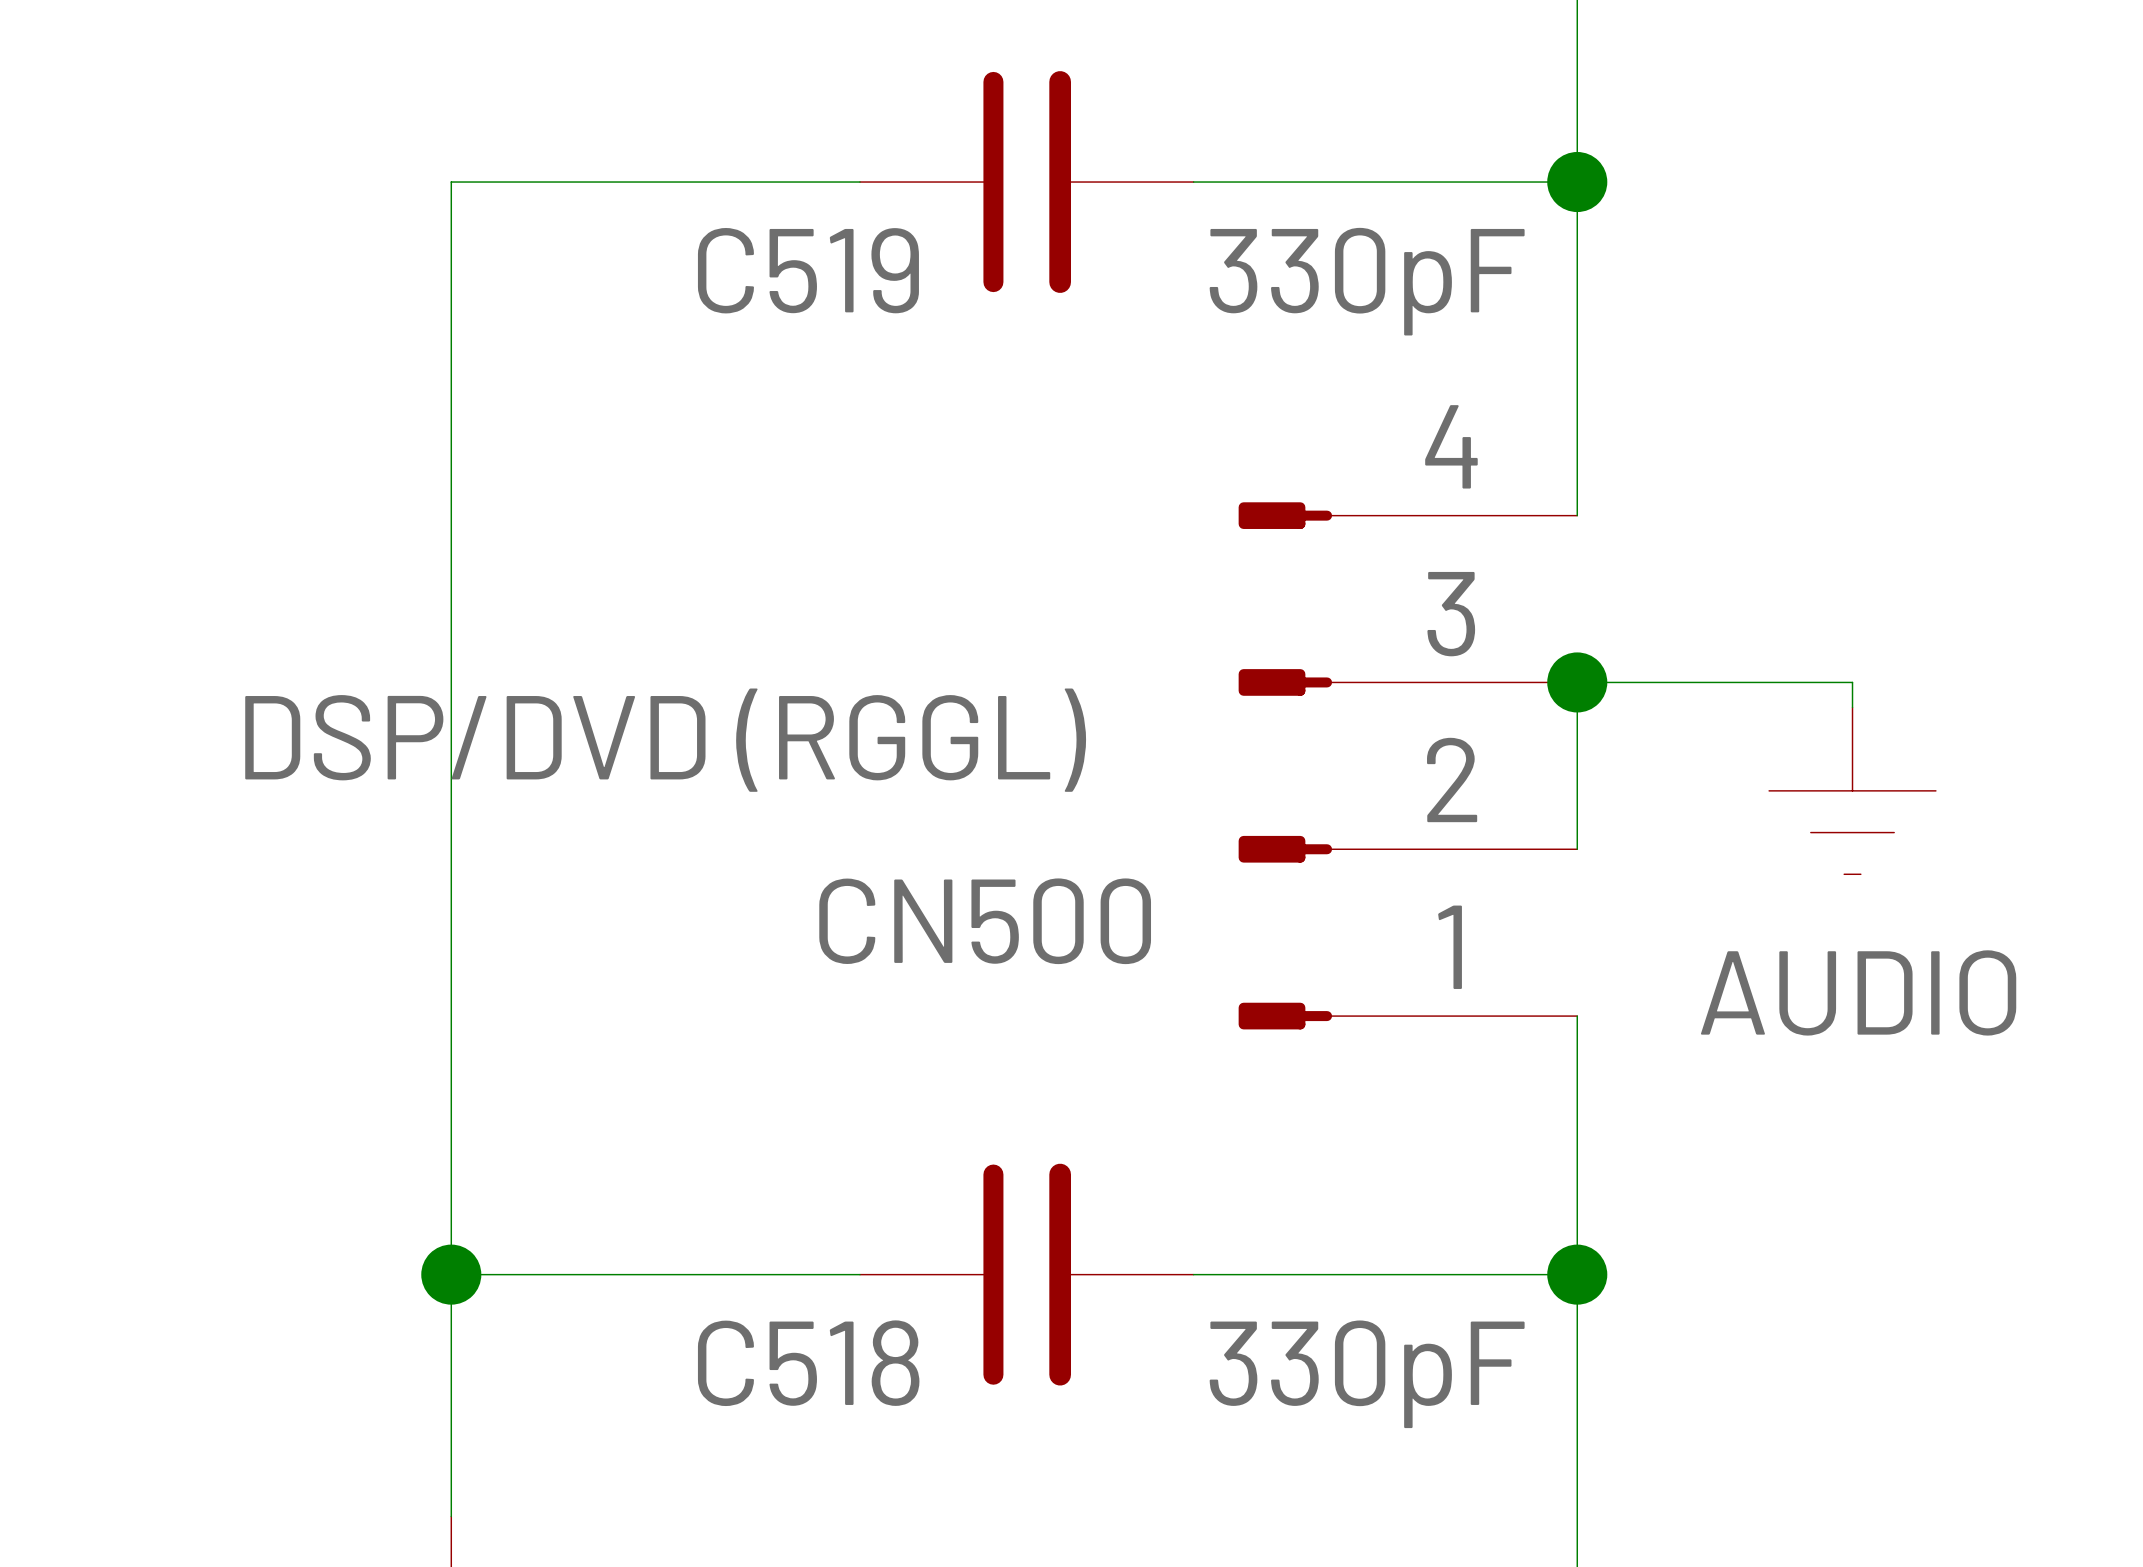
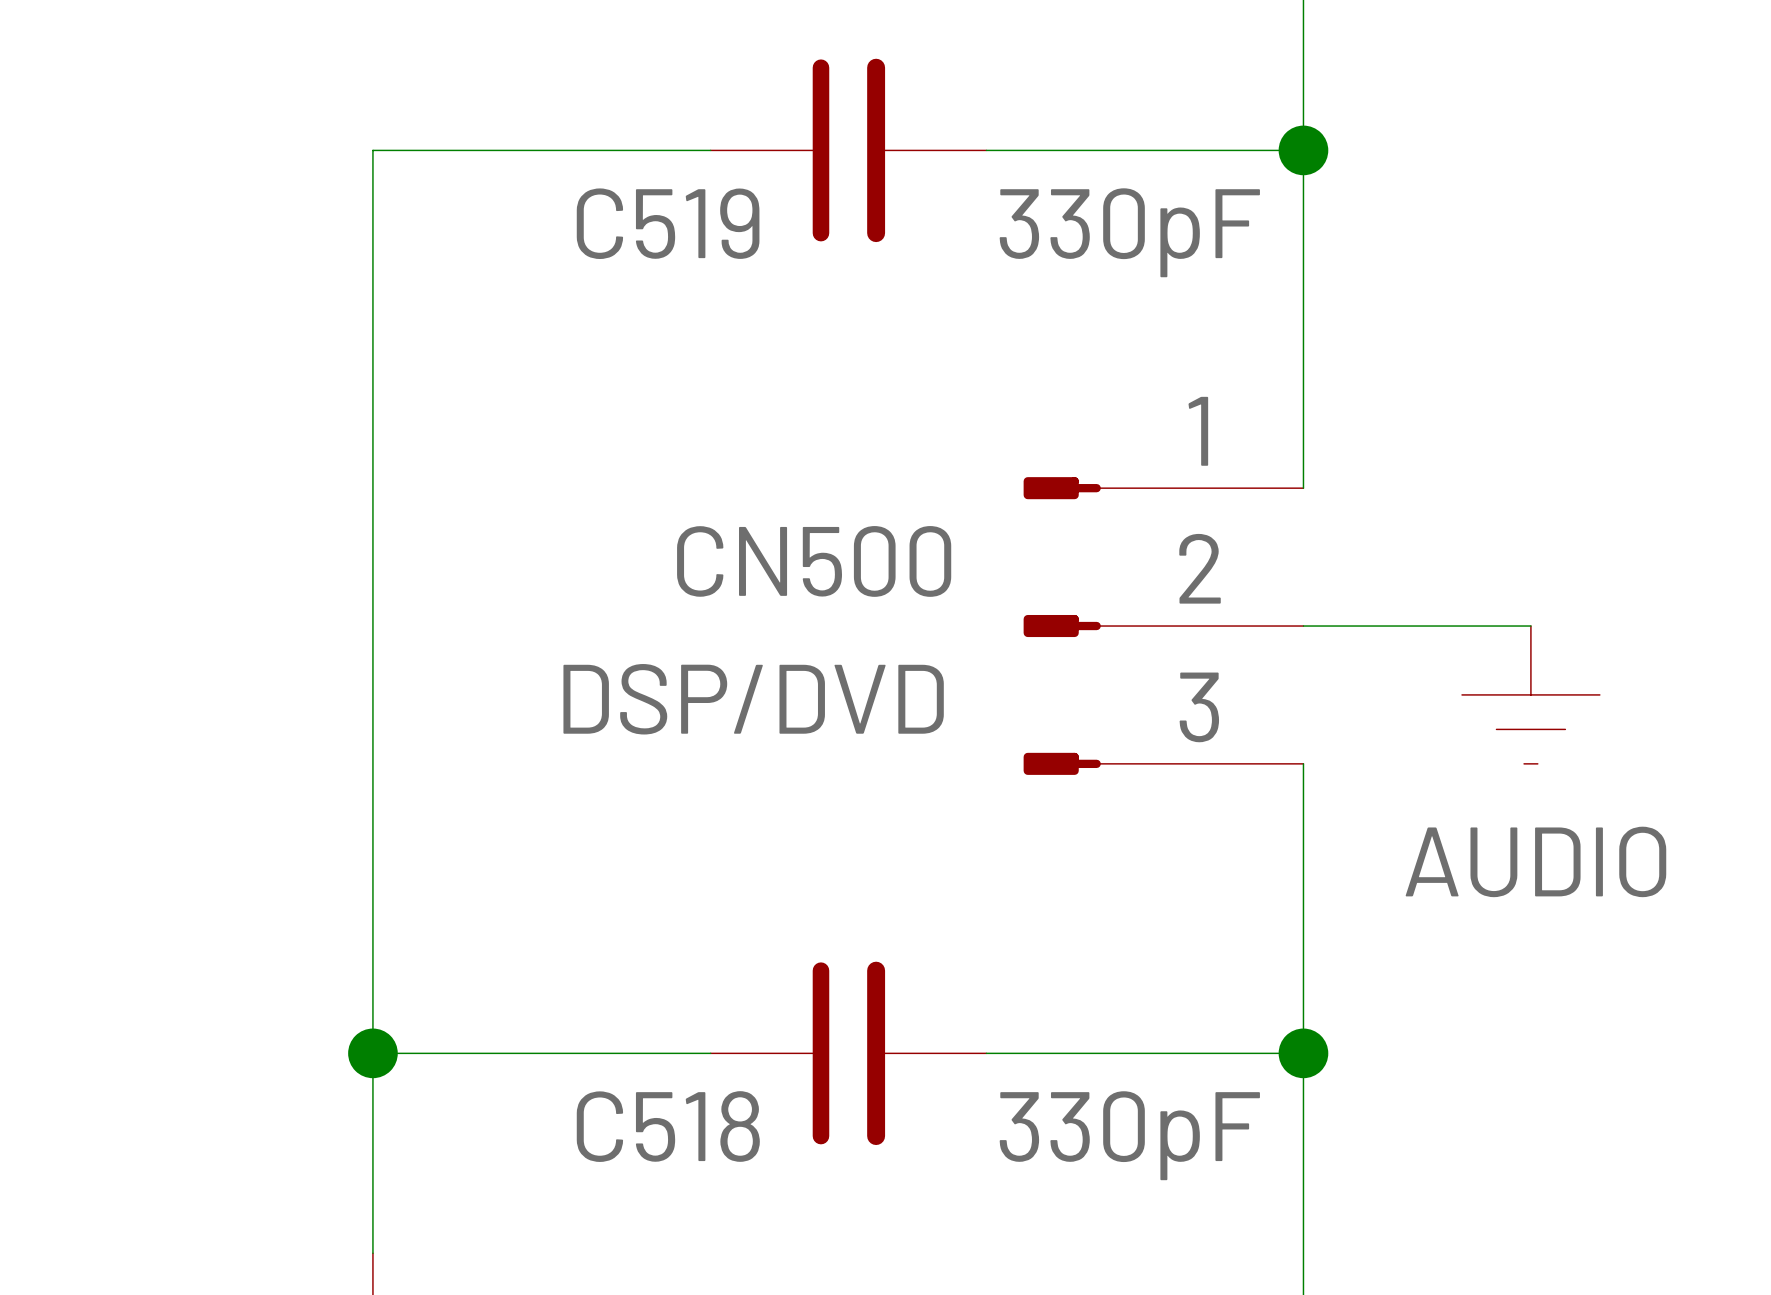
CN500 symbol: [1238, 502, 1578, 1030] -> [1023, 477, 1304, 775]
wire: none -> (1303, 426) (1303, 488)
junction: (1577, 682) -> none
wire: (1852, 707) (1852, 682) (1577, 682) (1577, 849) -> none
CN500 value: DSP/DVD (RGGL) (665, 740) -> DSP/DVD (753, 699)
wire: none -> (1303, 626) (1530, 626)
power symbol position: AUDIO (1852, 790) -> AUDIO (1530, 694)
CN500 name position: CN500 (985, 921) -> CN500 (814, 561)
wire: none -> (1303, 763) (1303, 839)

